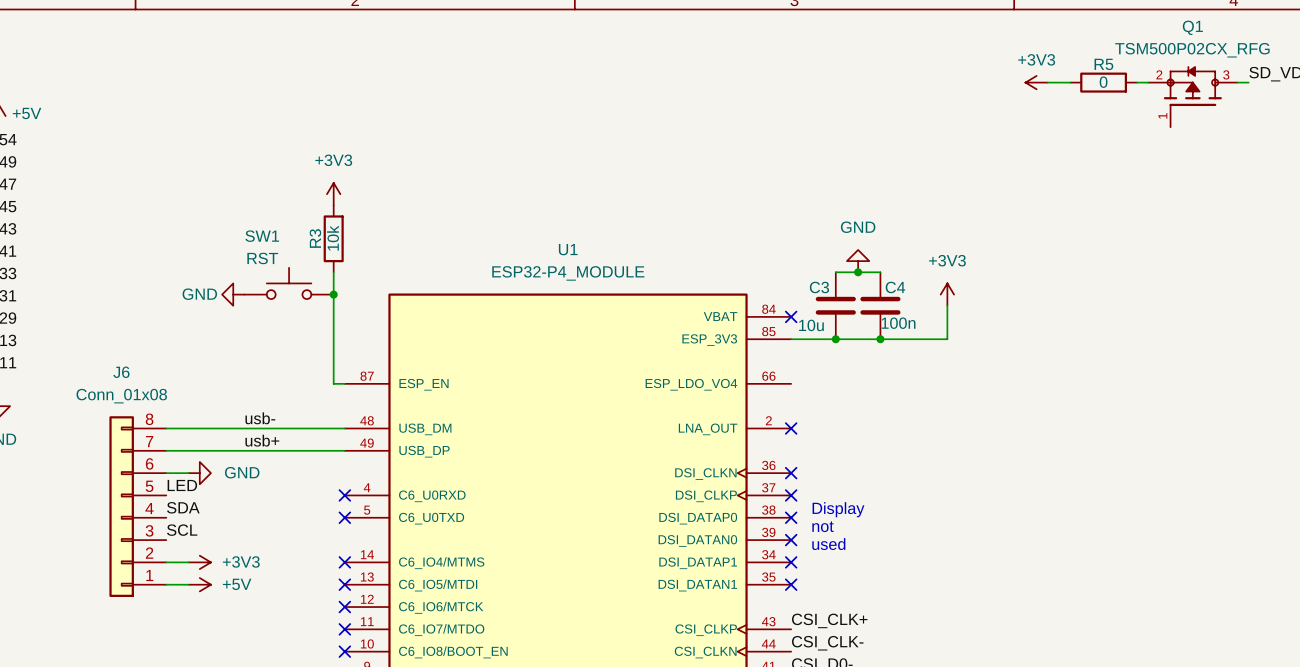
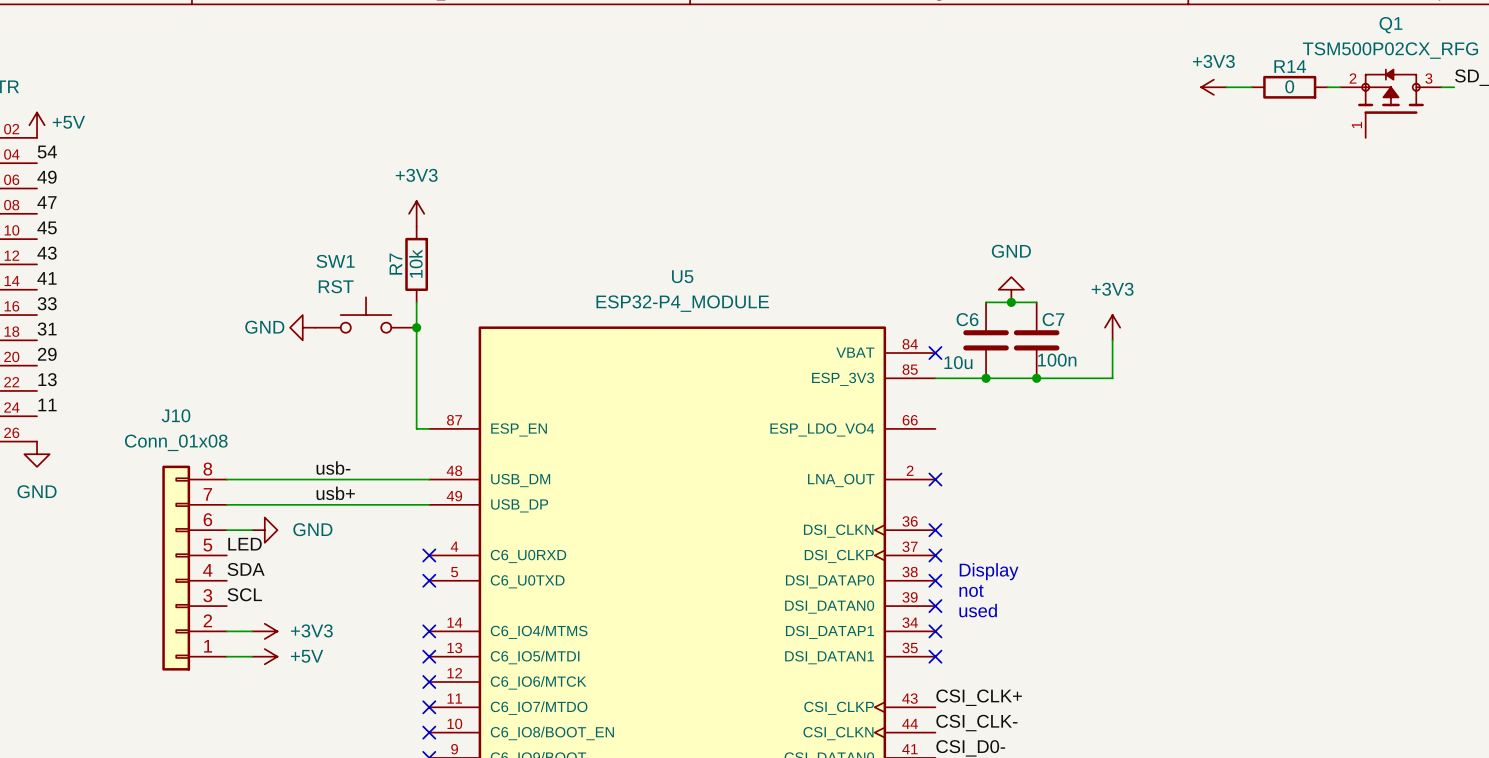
R5 name: R5 (1103, 64) -> R14 (1290, 66)
R3 name: R3 (315, 238) -> R7 (395, 264)
U1 name: U1 (568, 249) -> U5 (682, 276)
C3 name: C3 (819, 287) -> C6 (967, 319)
C4 name: C4 (895, 287) -> C7 (1053, 319)
J6 name: J6 (121, 372) -> J10 (175, 415)

